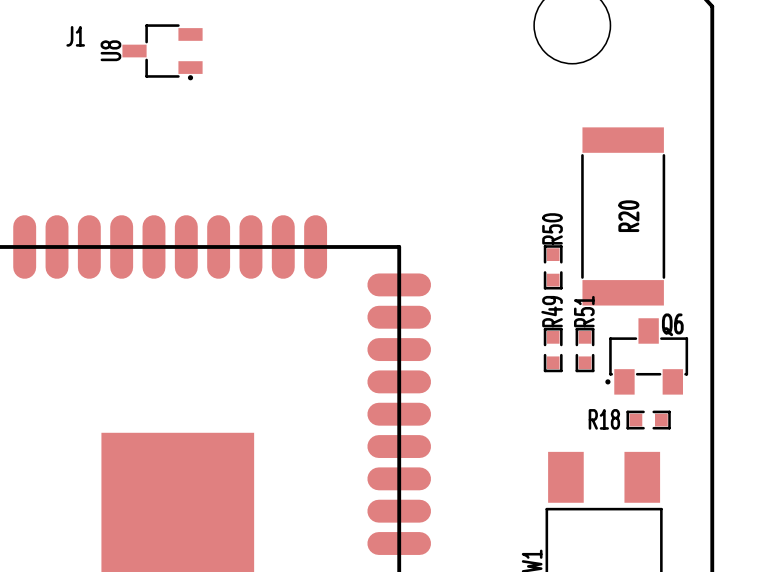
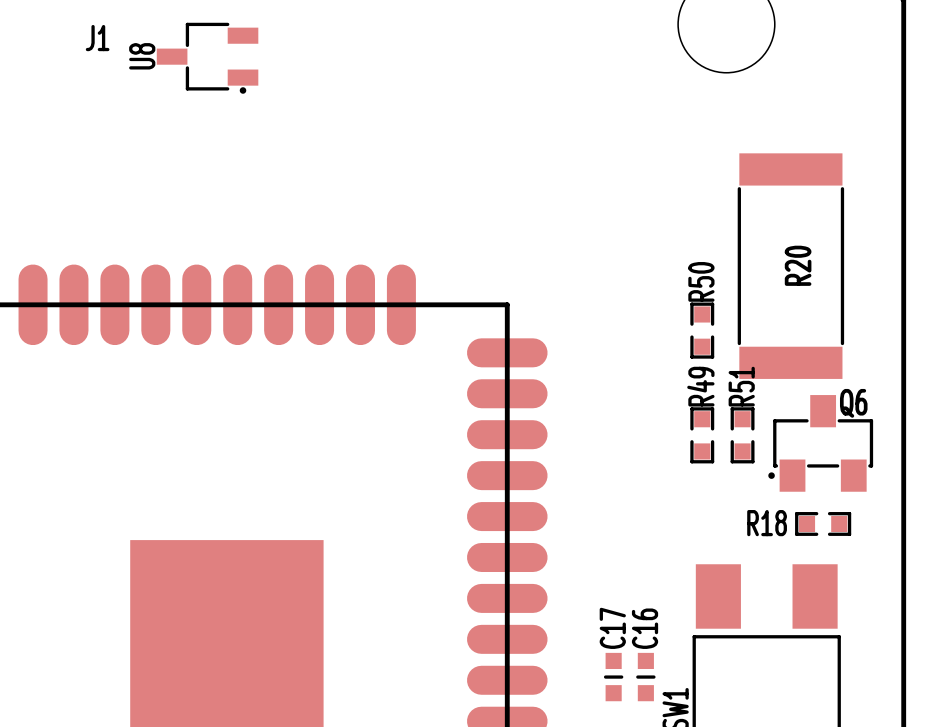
C17: none -> (613, 677)
C16: none -> (645, 677)

